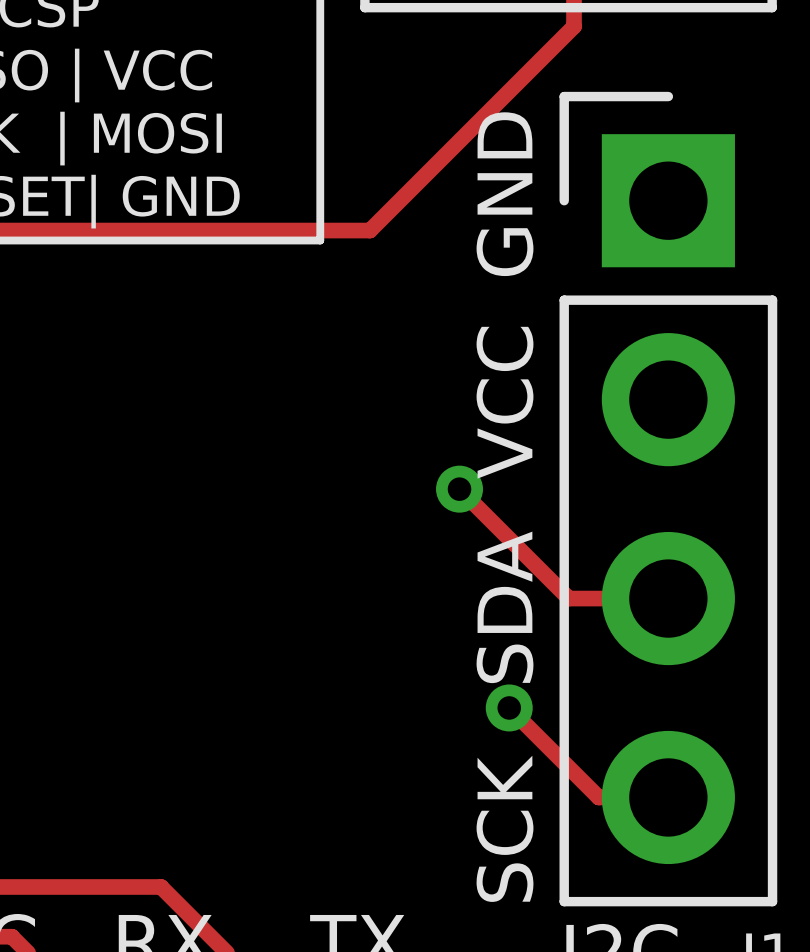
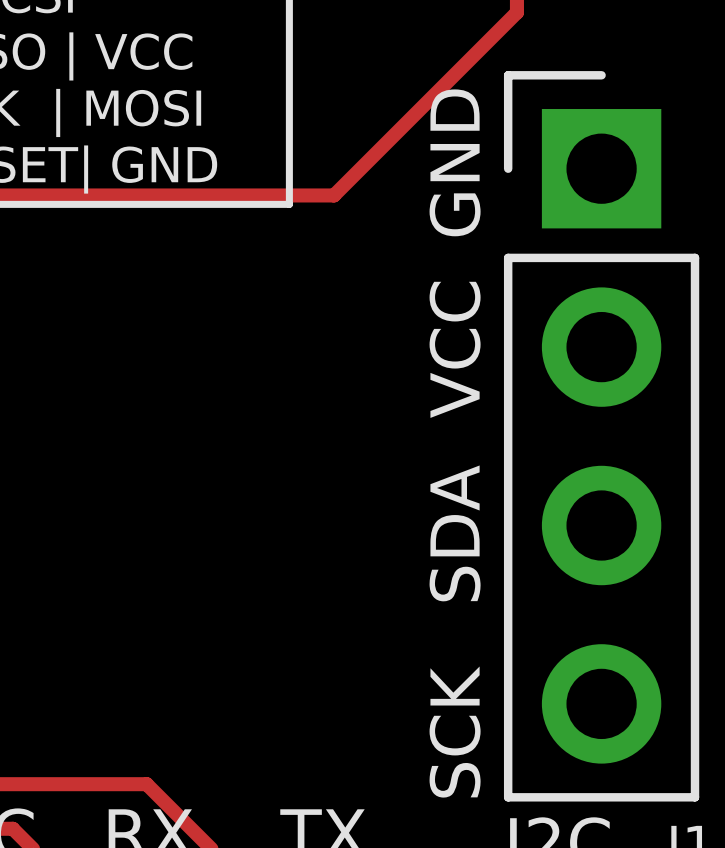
track: (459, 489) (568, 598) (668, 598) -> none
via: (459, 489) -> none
track: (509, 707) (598, 797) (668, 797) -> none
via: (509, 707) -> none

